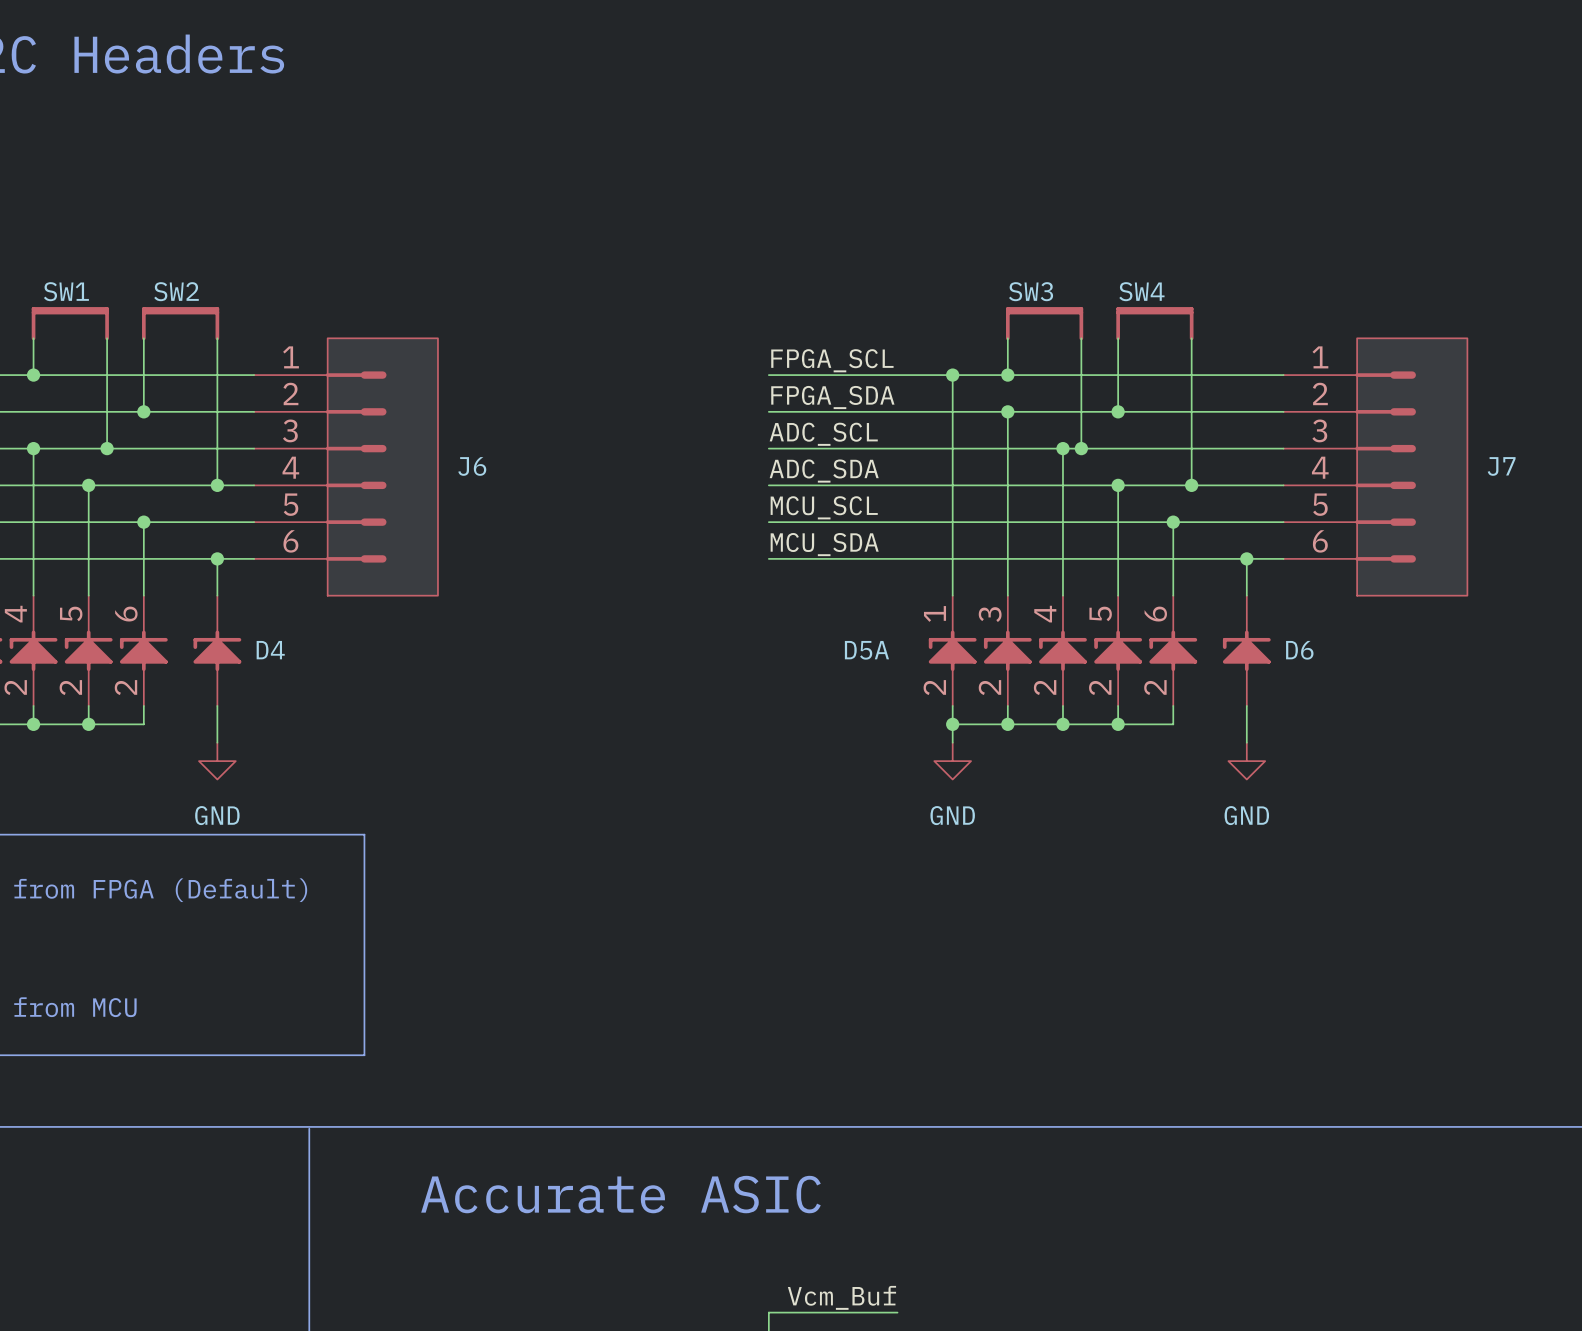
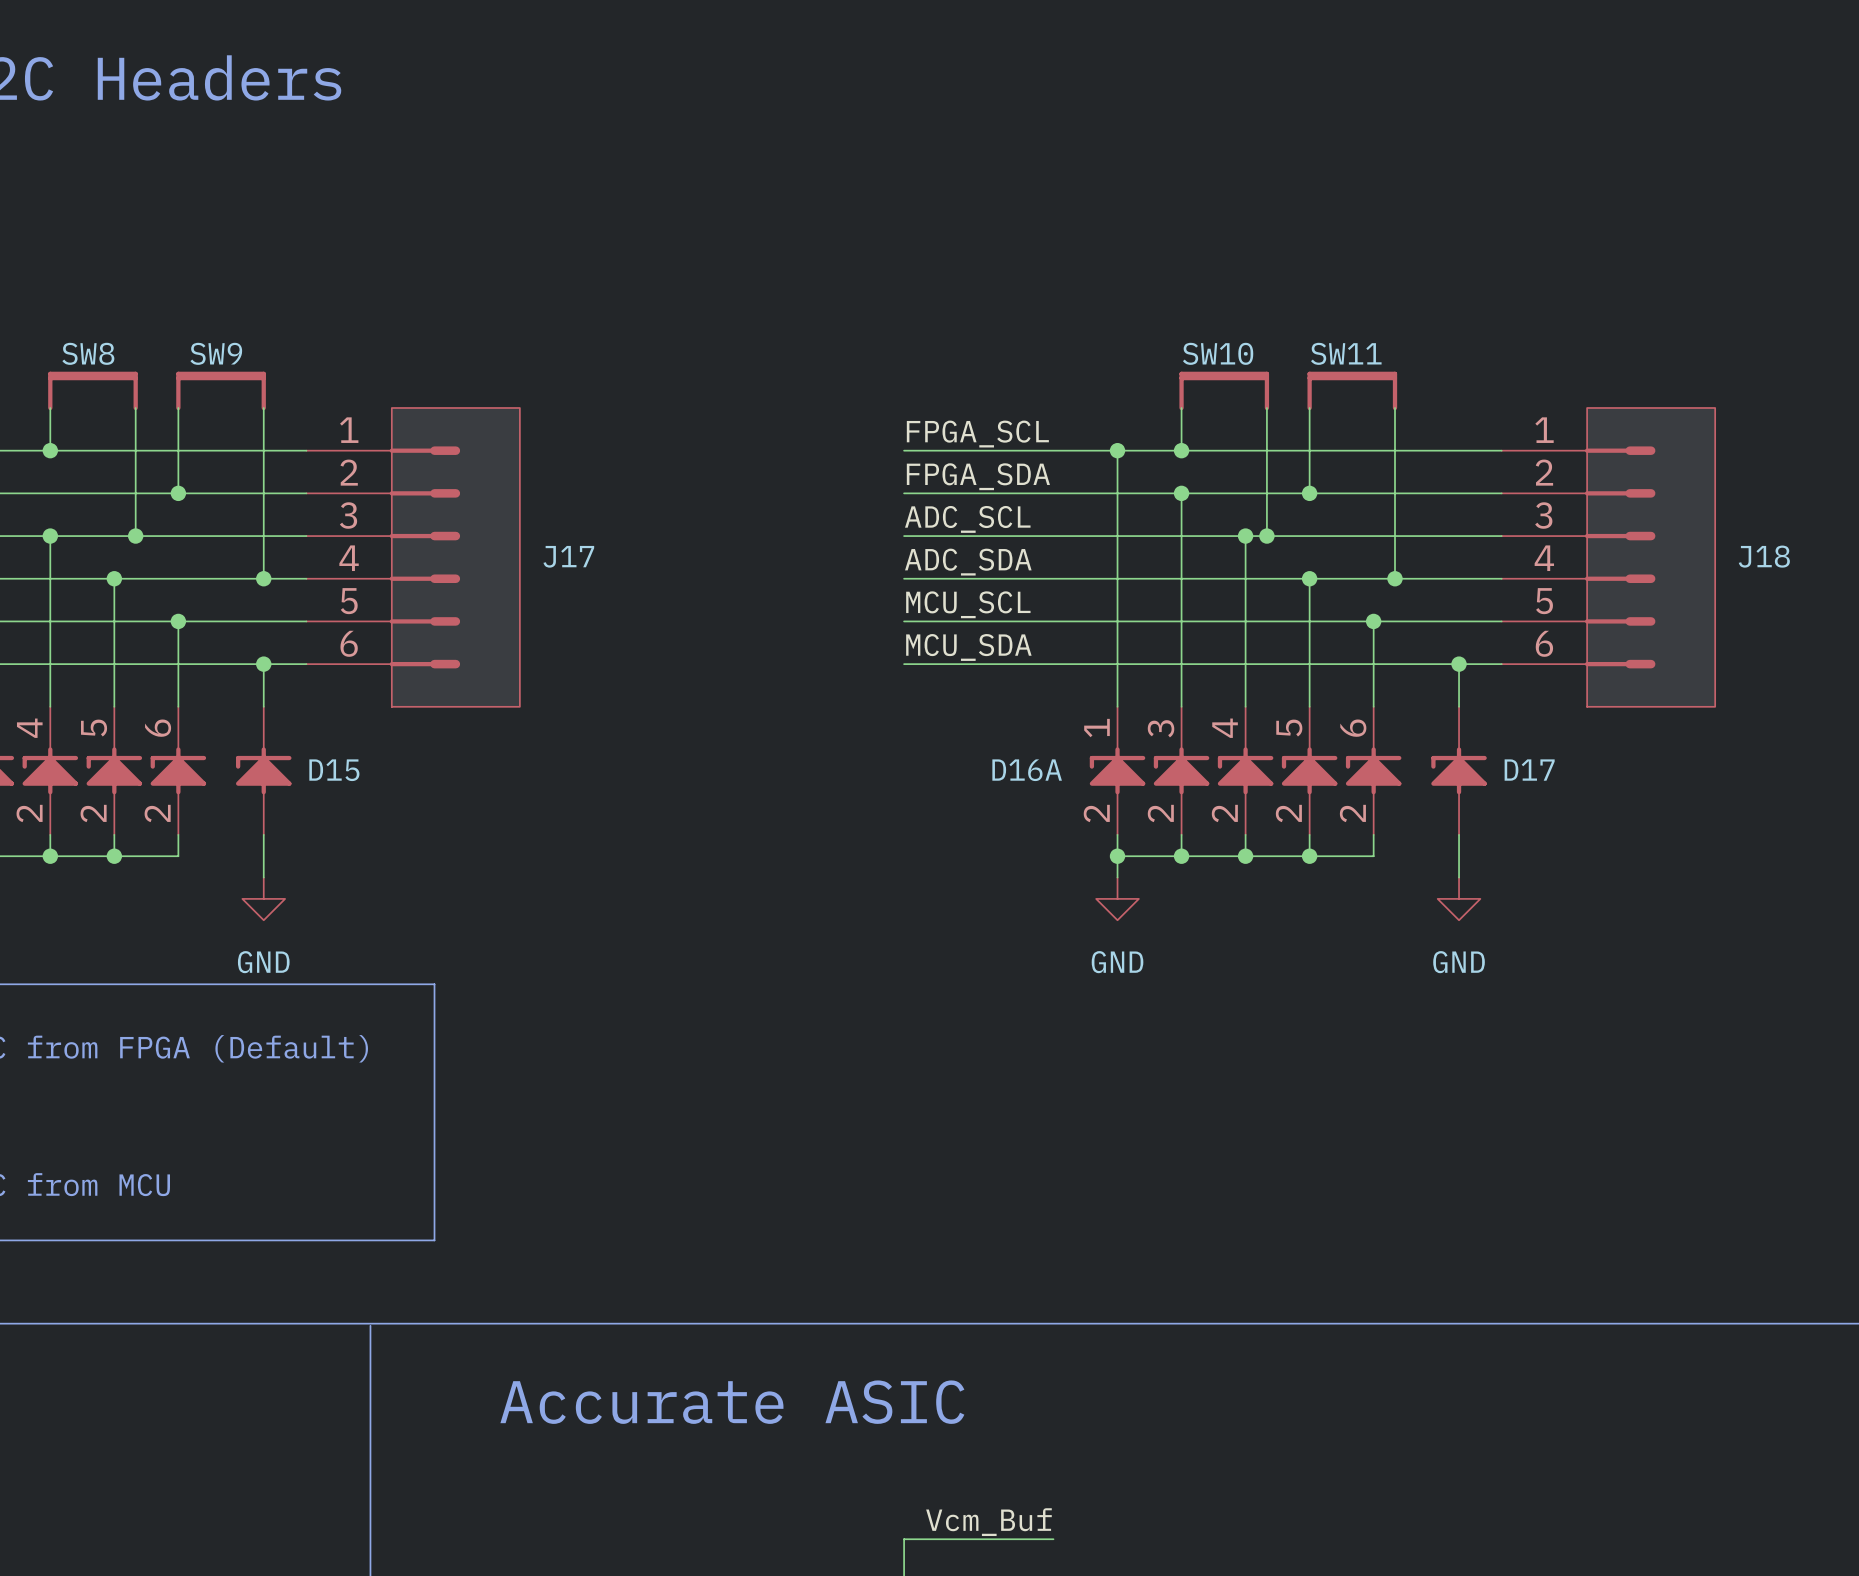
SW1 name: SW1 (66, 291) -> SW8 (88, 353)
SW2 name: SW2 (176, 291) -> SW9 (216, 353)
SW3 name: SW3 (1031, 291) -> SW10 (1218, 353)
SW4 name: SW4 (1141, 291) -> SW11 (1346, 353)
J6 name: J6 (472, 466) -> J17 (568, 556)
J7 name: J7 (1501, 466) -> J18 (1764, 556)
D4 name: D4 (270, 650) -> D15 (334, 770)
D5A name: D5A (866, 650) -> D16A (1027, 770)
D6 name: D6 (1299, 650) -> D17 (1529, 770)

